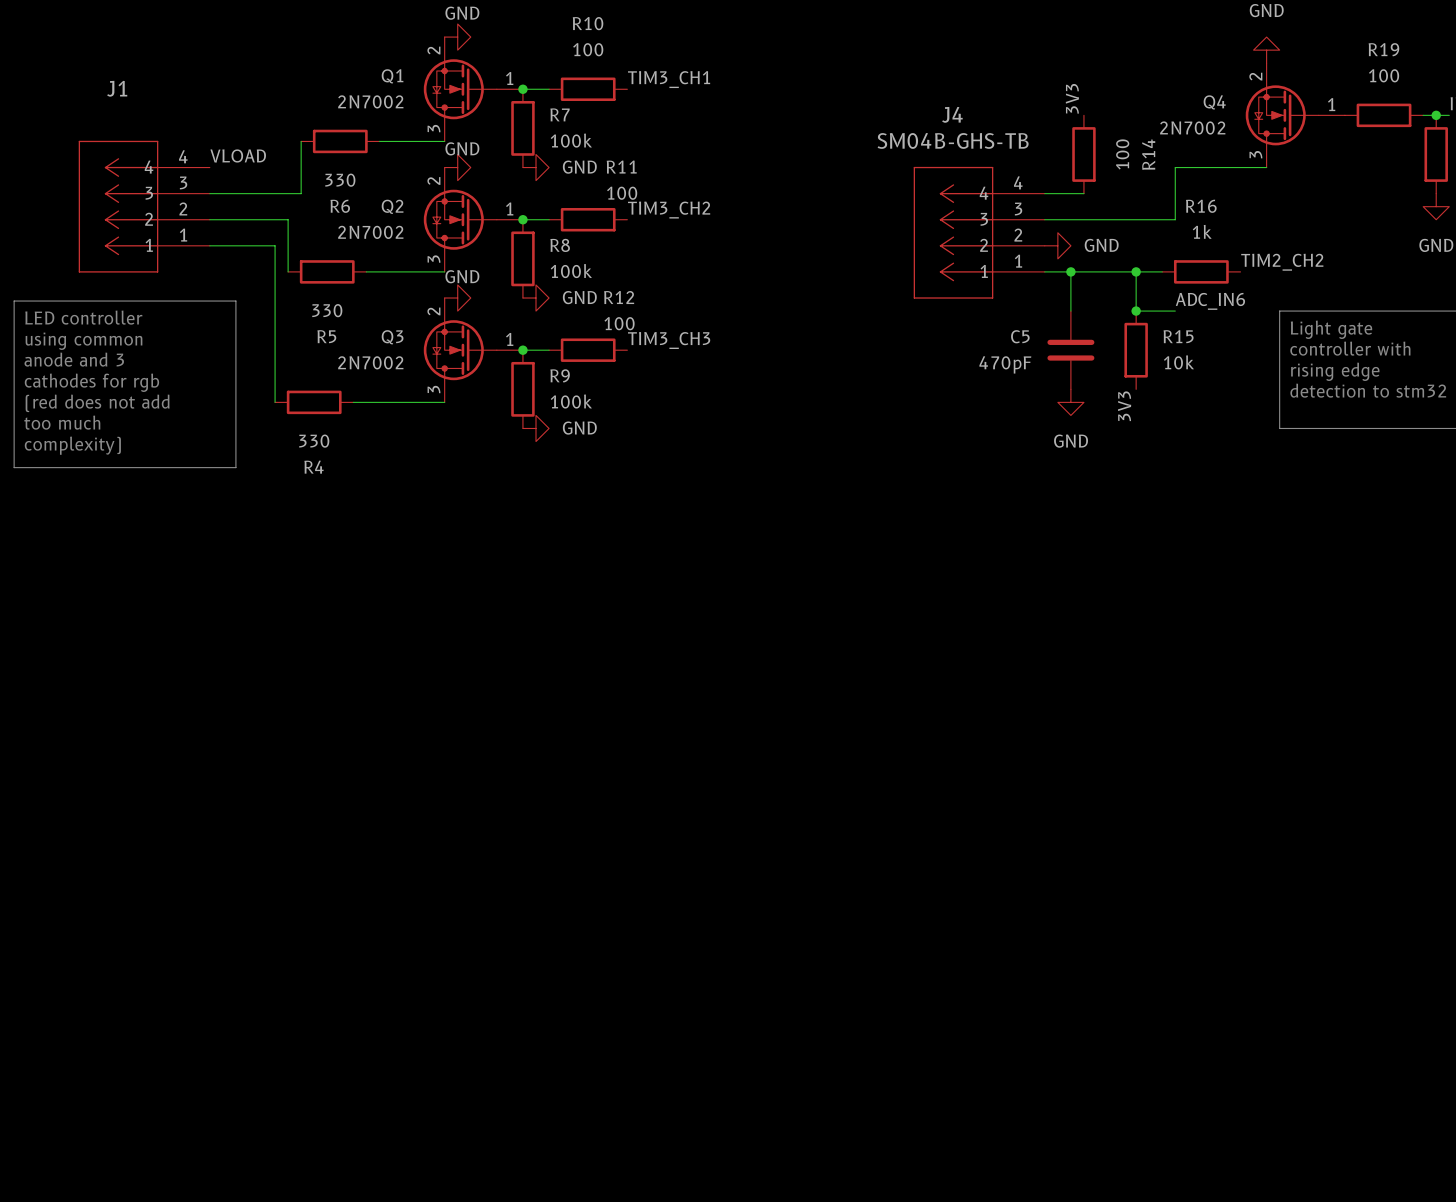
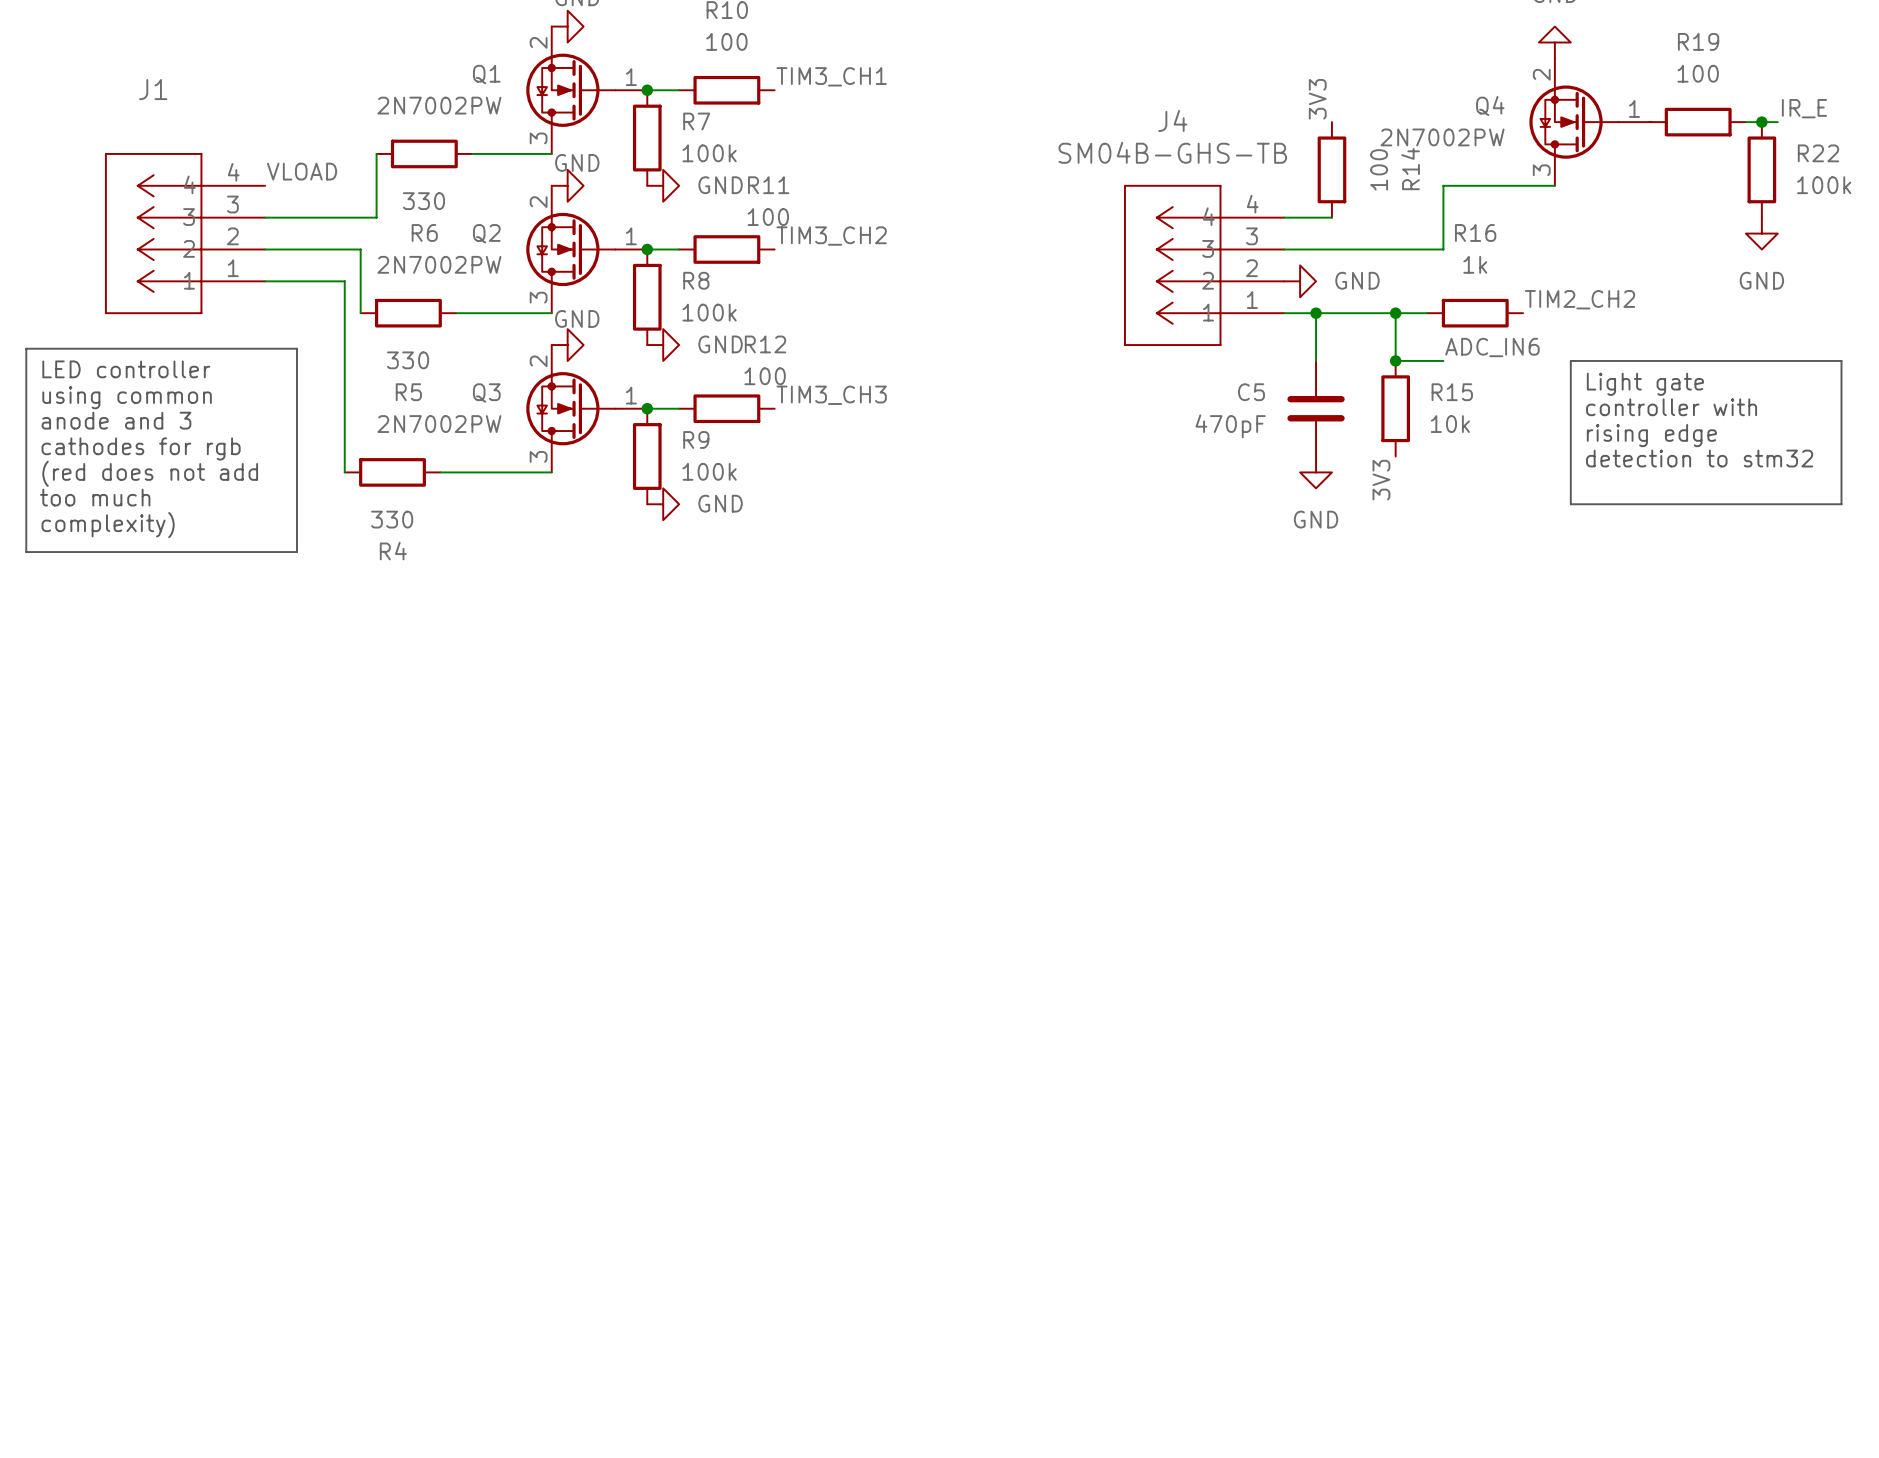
Q1 value: 2N7002 (370, 101) -> 2N7002PW (439, 105)
Q4 value: 2N7002 (1192, 127) -> 2N7002PW (1442, 137)
Q2 value: 2N7002 (370, 232) -> 2N7002PW (439, 264)
Q3 value: 2N7002 (370, 362) -> 2N7002PW (439, 424)

